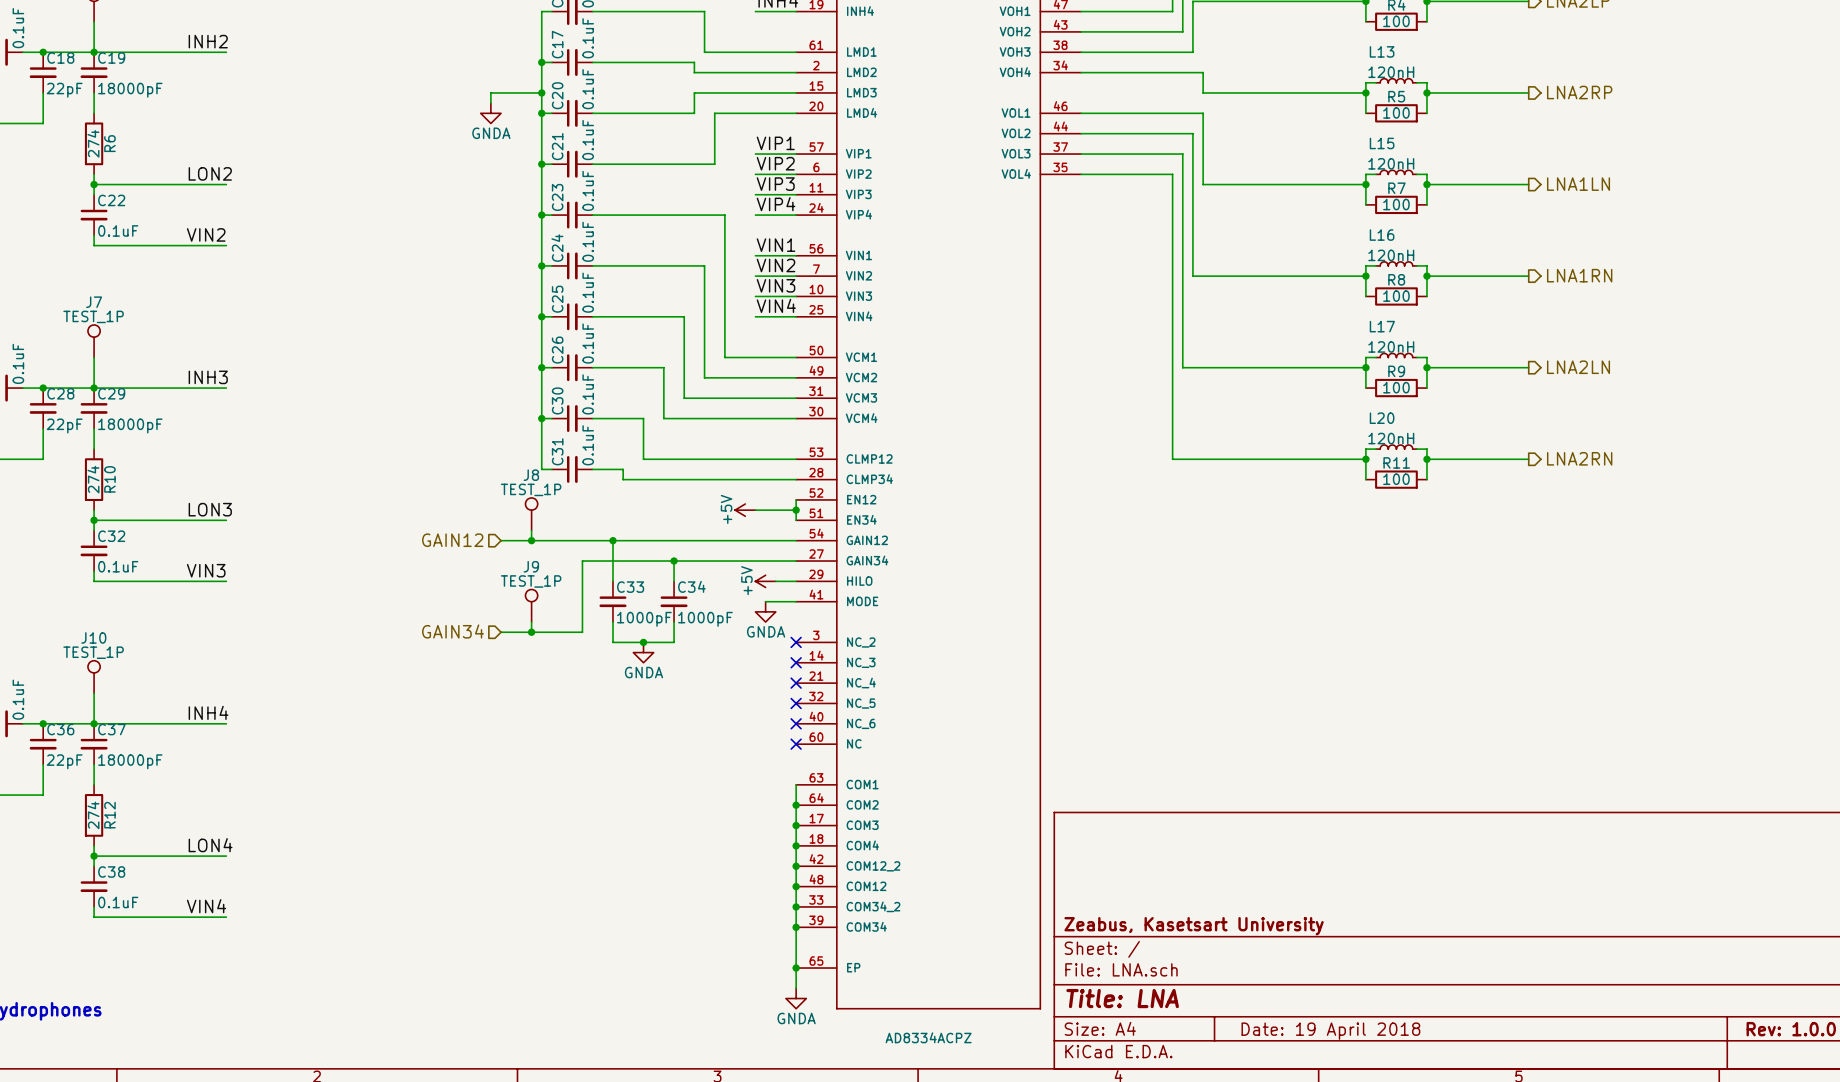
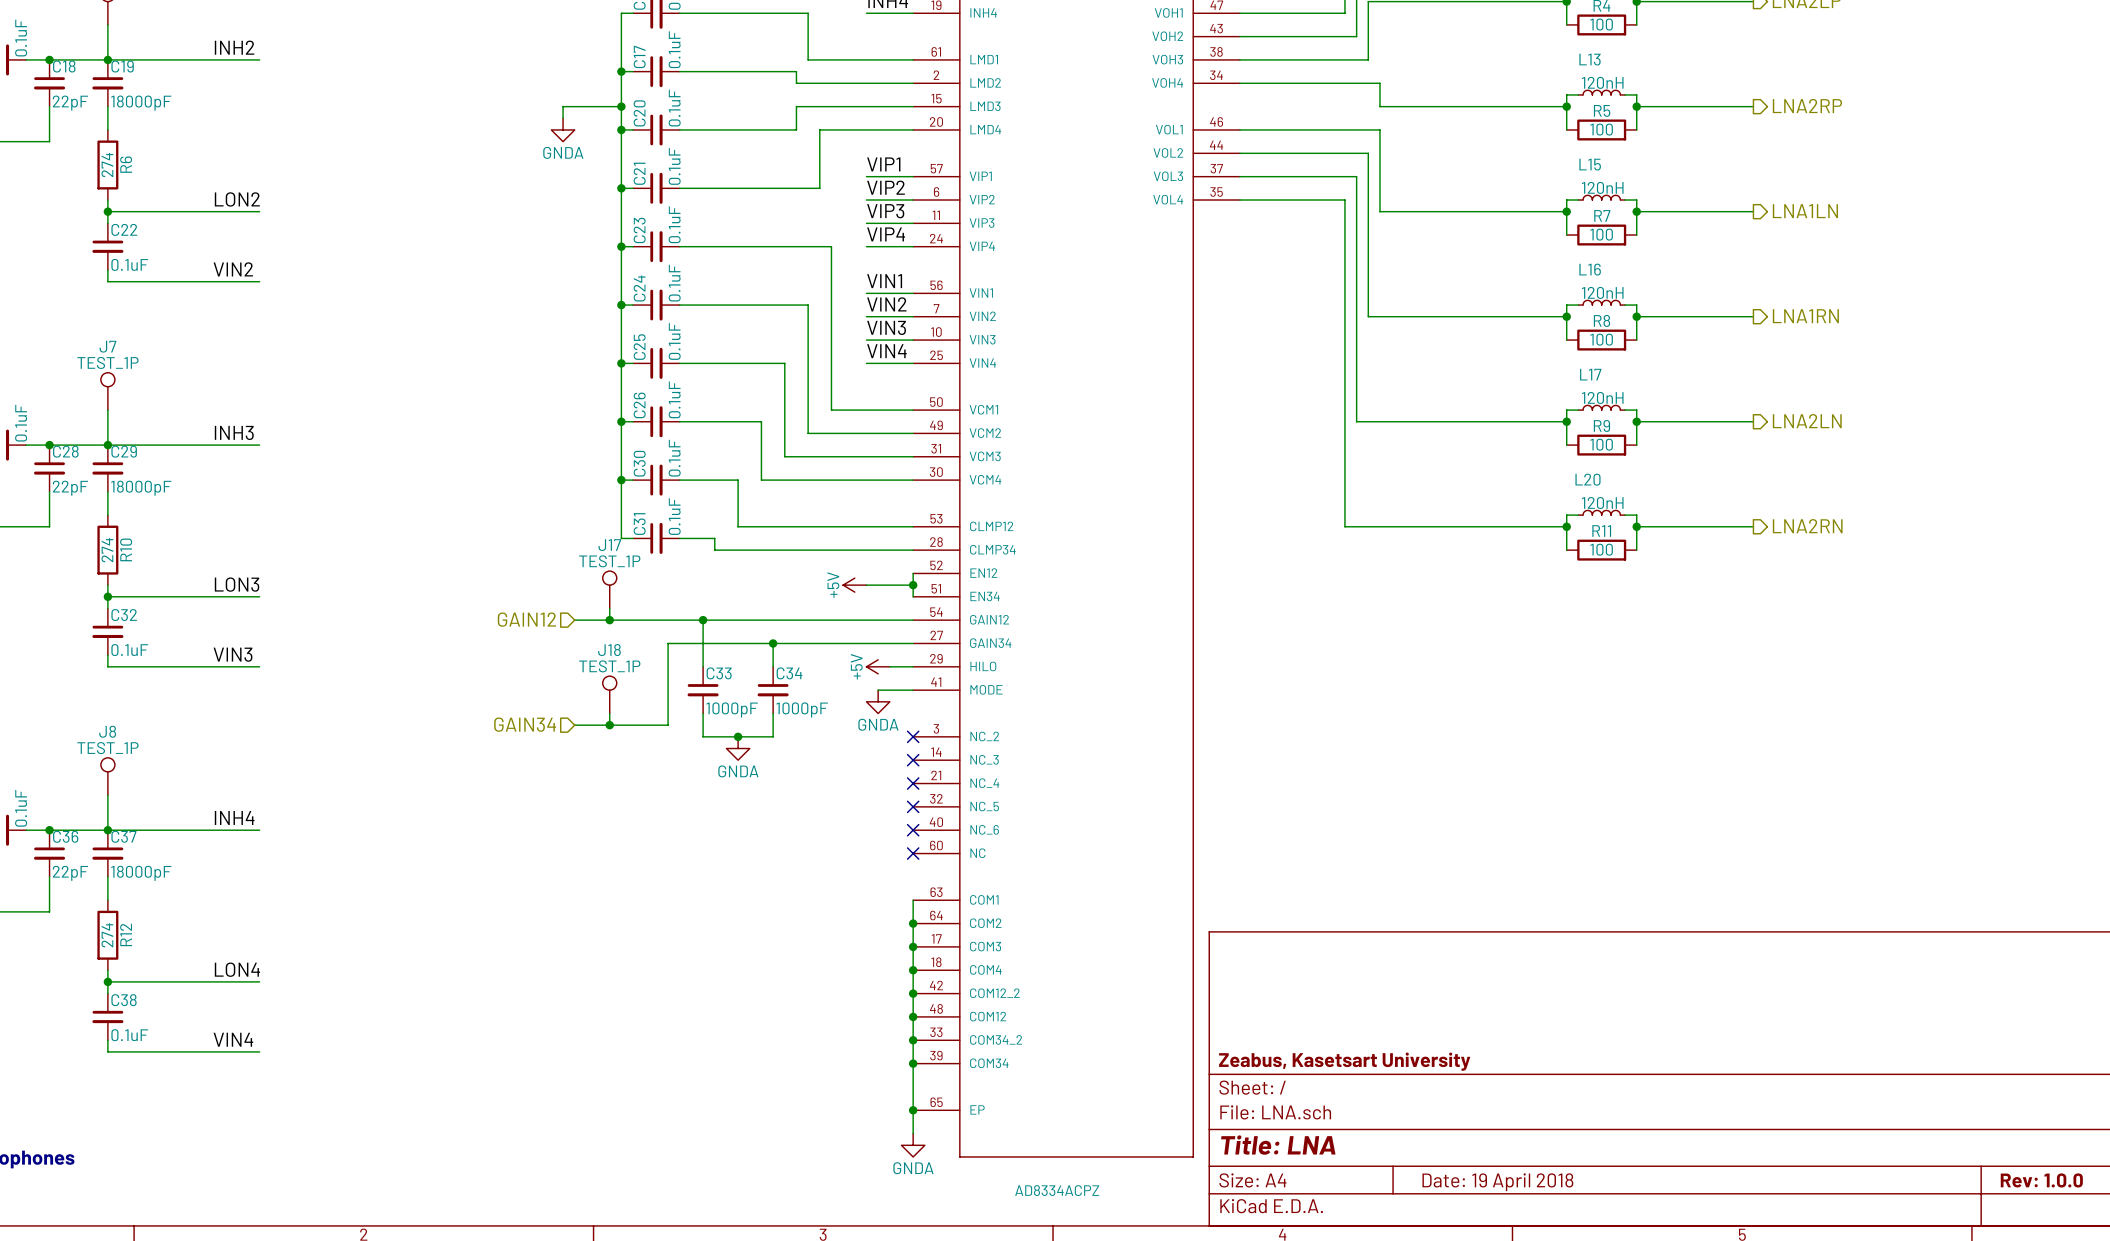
J8 name: J8 (531, 475) -> J17 (609, 545)
J9 name: J9 (531, 566) -> J18 (609, 650)
J10 name: J10 (93, 637) -> J8 (107, 731)

